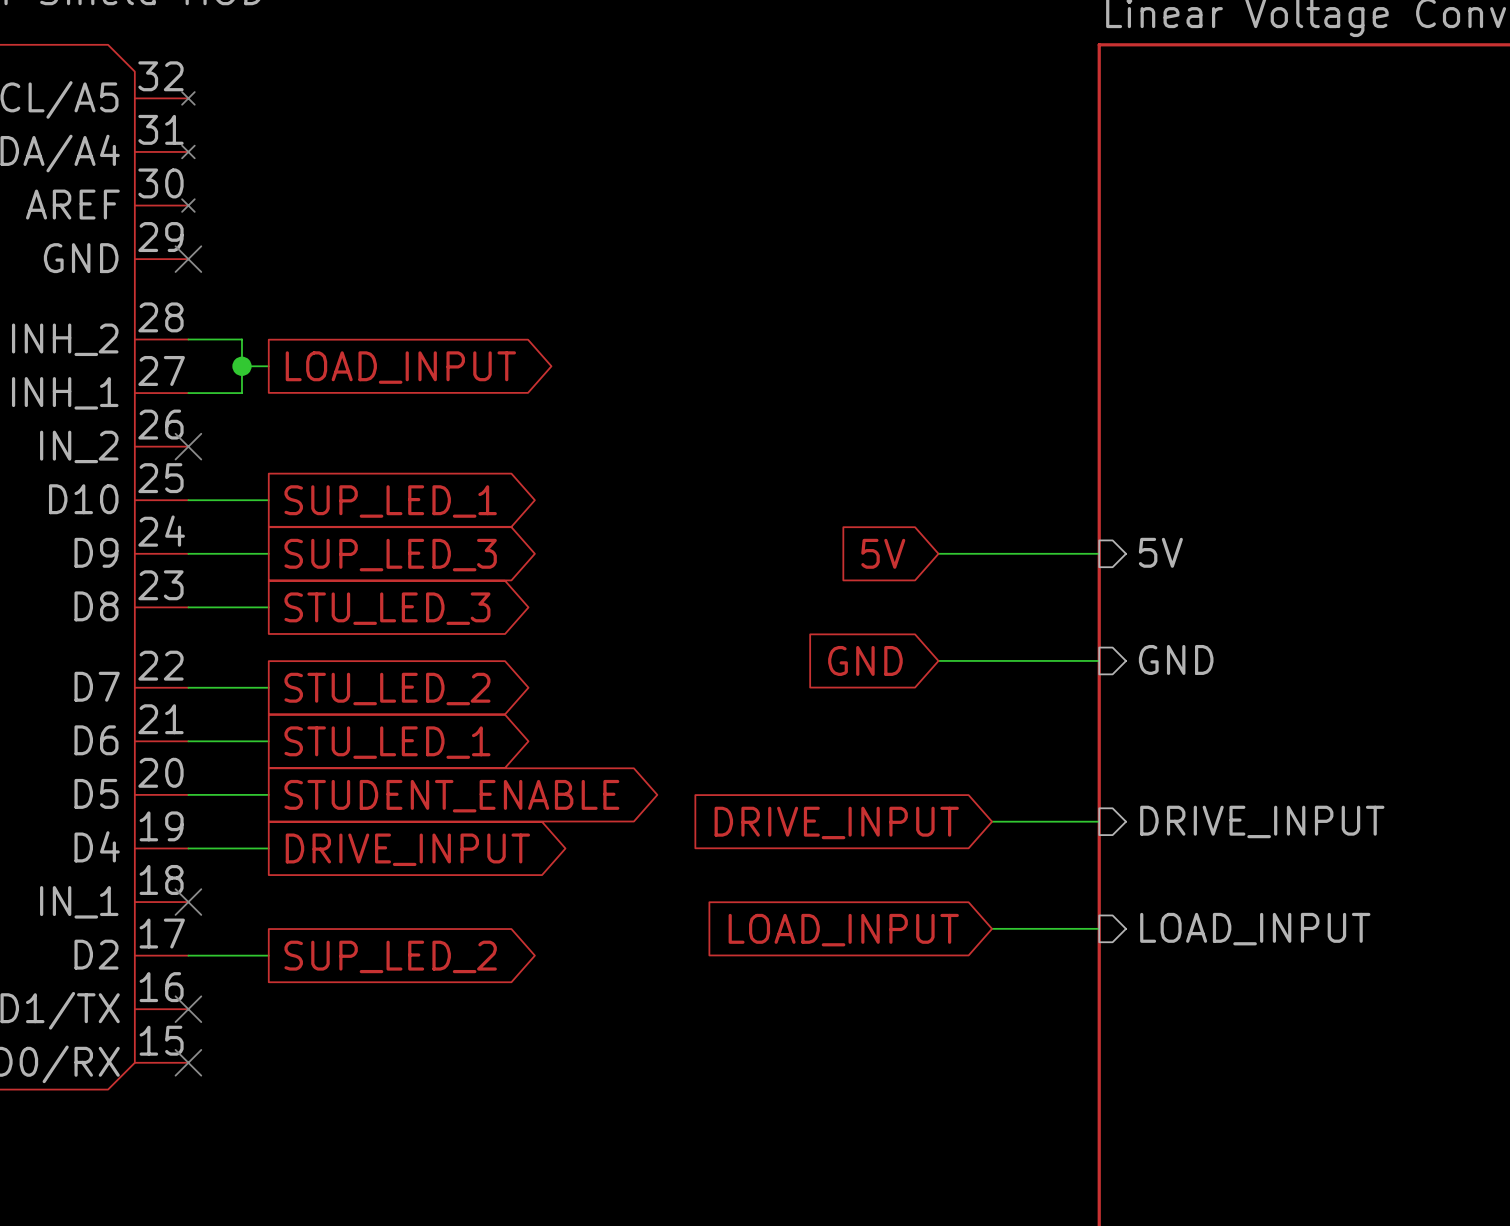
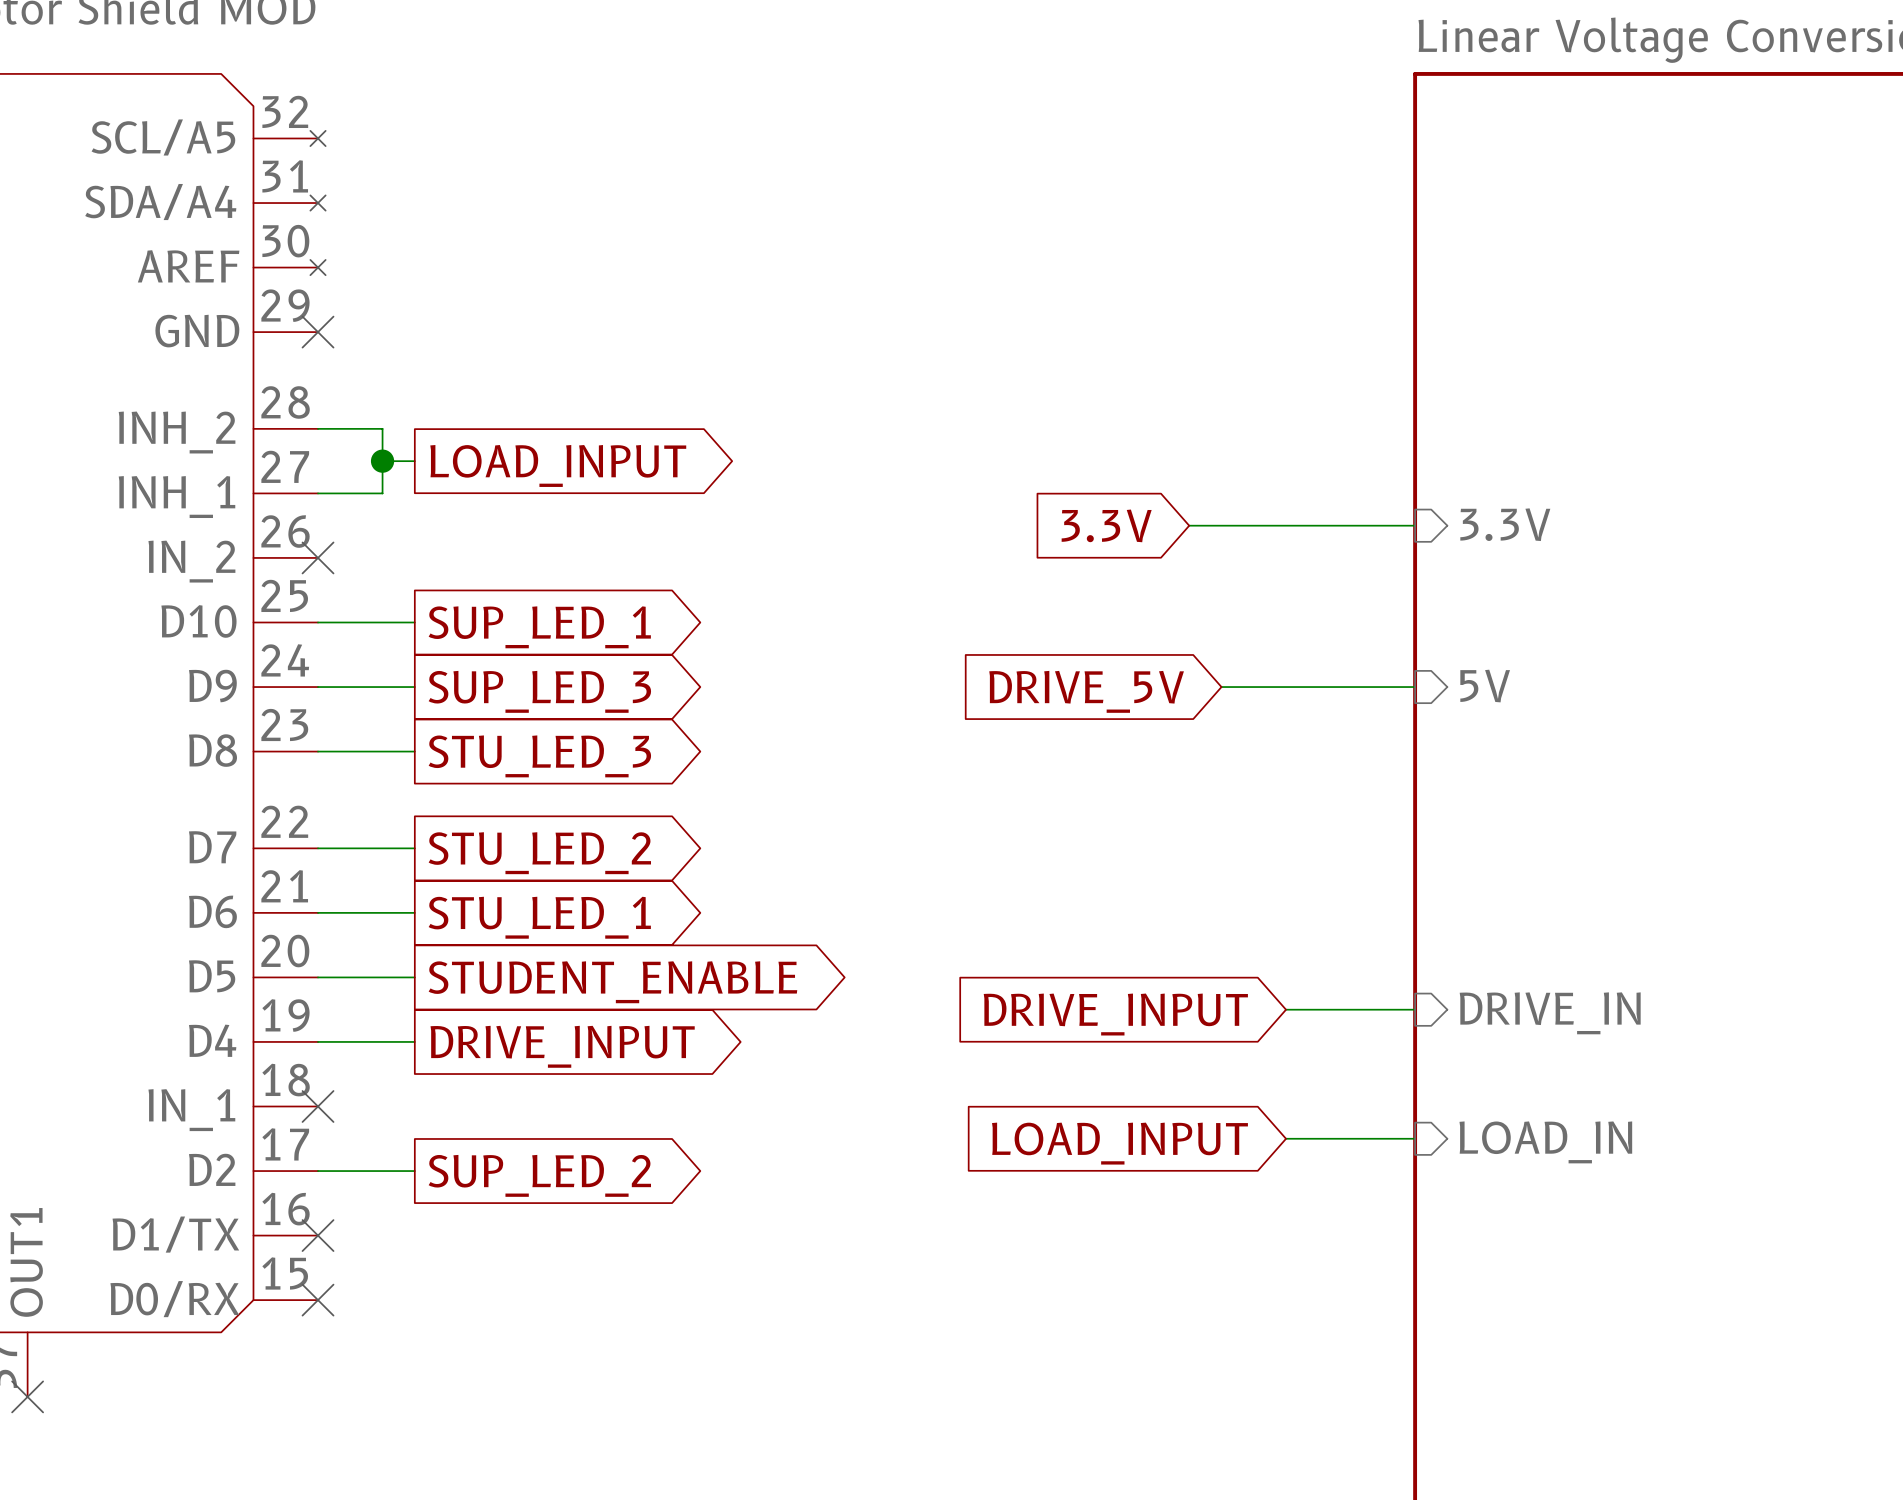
sheet pin: none -> 3.3V (1505, 524)
global label: none -> 3.3V (1106, 525)
wire: none -> (1189, 525) (1415, 525)
global label: 5V (883, 553) -> DRIVE_5V (1086, 691)
sheet pin: GND (1176, 659) -> none
global label: GND (865, 660) -> none
wire: (938, 660) (1099, 660) -> none
sheet pin: DRIVE_INPUT (1262, 821) -> DRIVE_IN (1550, 1013)
sheet pin: LOAD_INPUT (1255, 929) -> LOAD_IN (1545, 1142)

